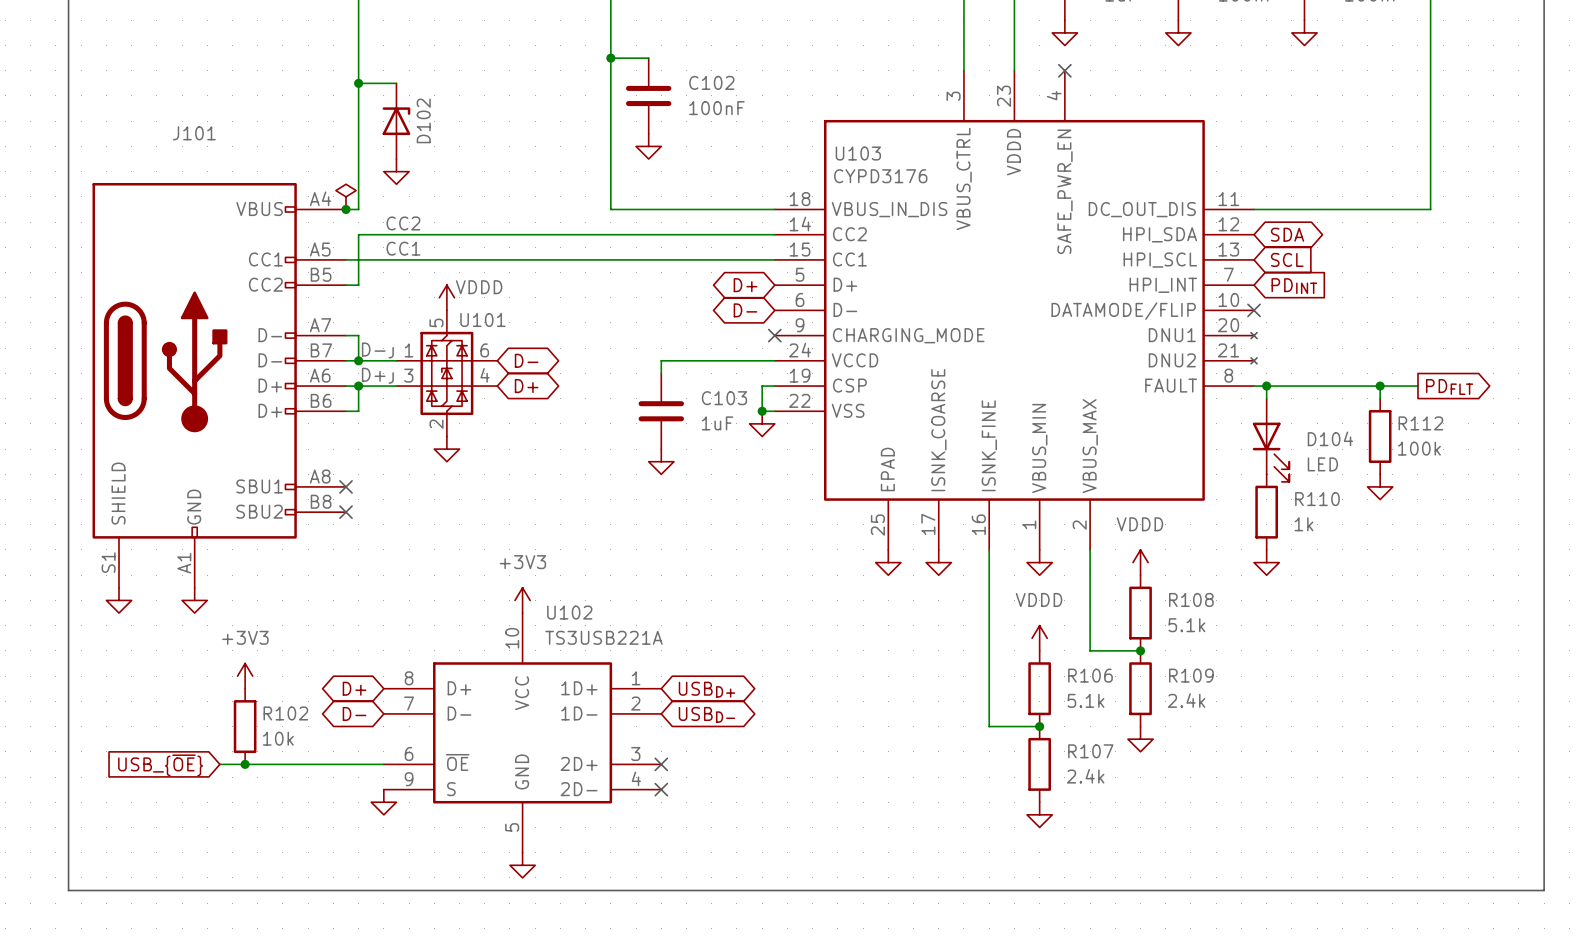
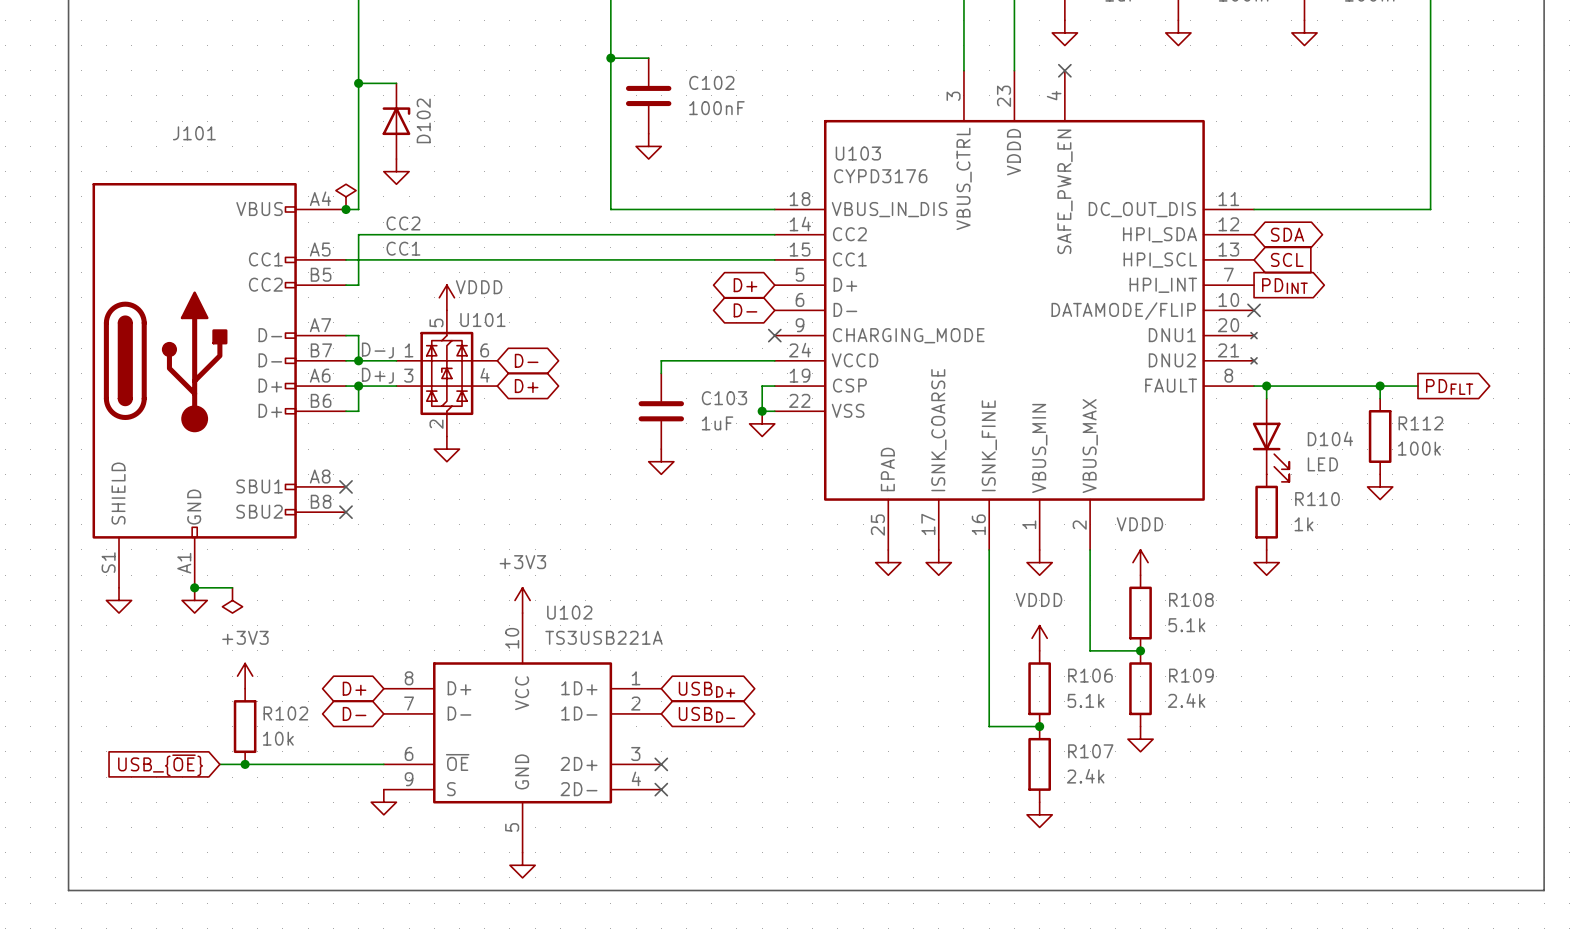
global label shape: input (1294, 286) -> output (1284, 286)
wire: none -> (194, 587) (232, 587)
junction: none -> (194, 587)
power symbol: none -> (232, 600)

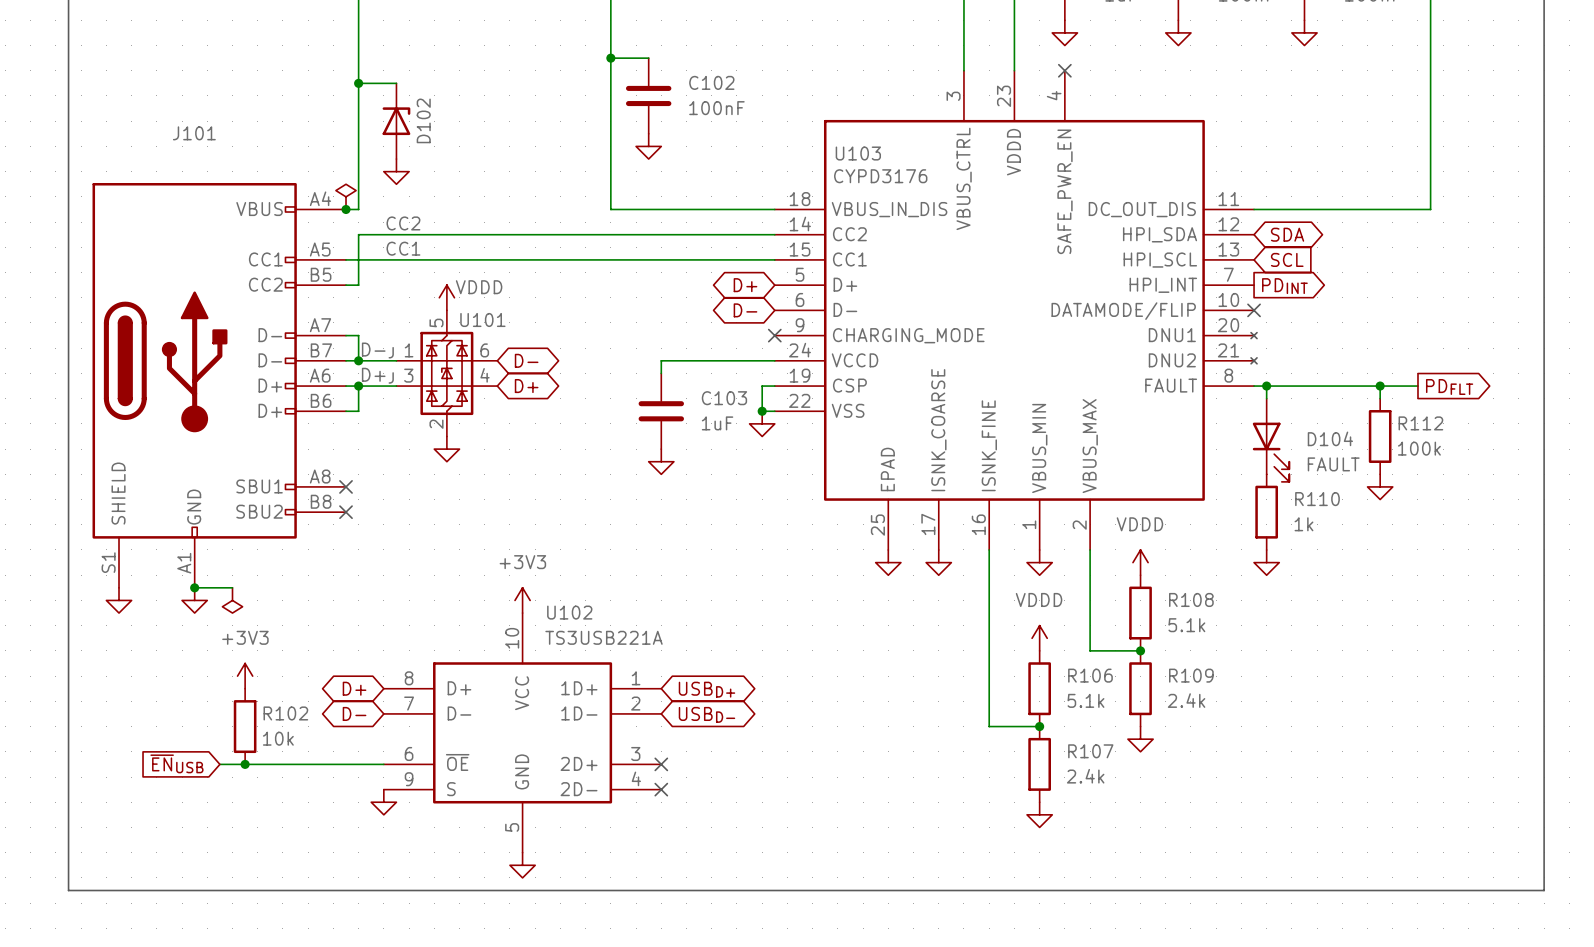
D104 value: LED (1322, 464) -> FAULT (1333, 464)
global label: USB_{~{OE}} (160, 765) -> ~{EN}USB (176, 763)

